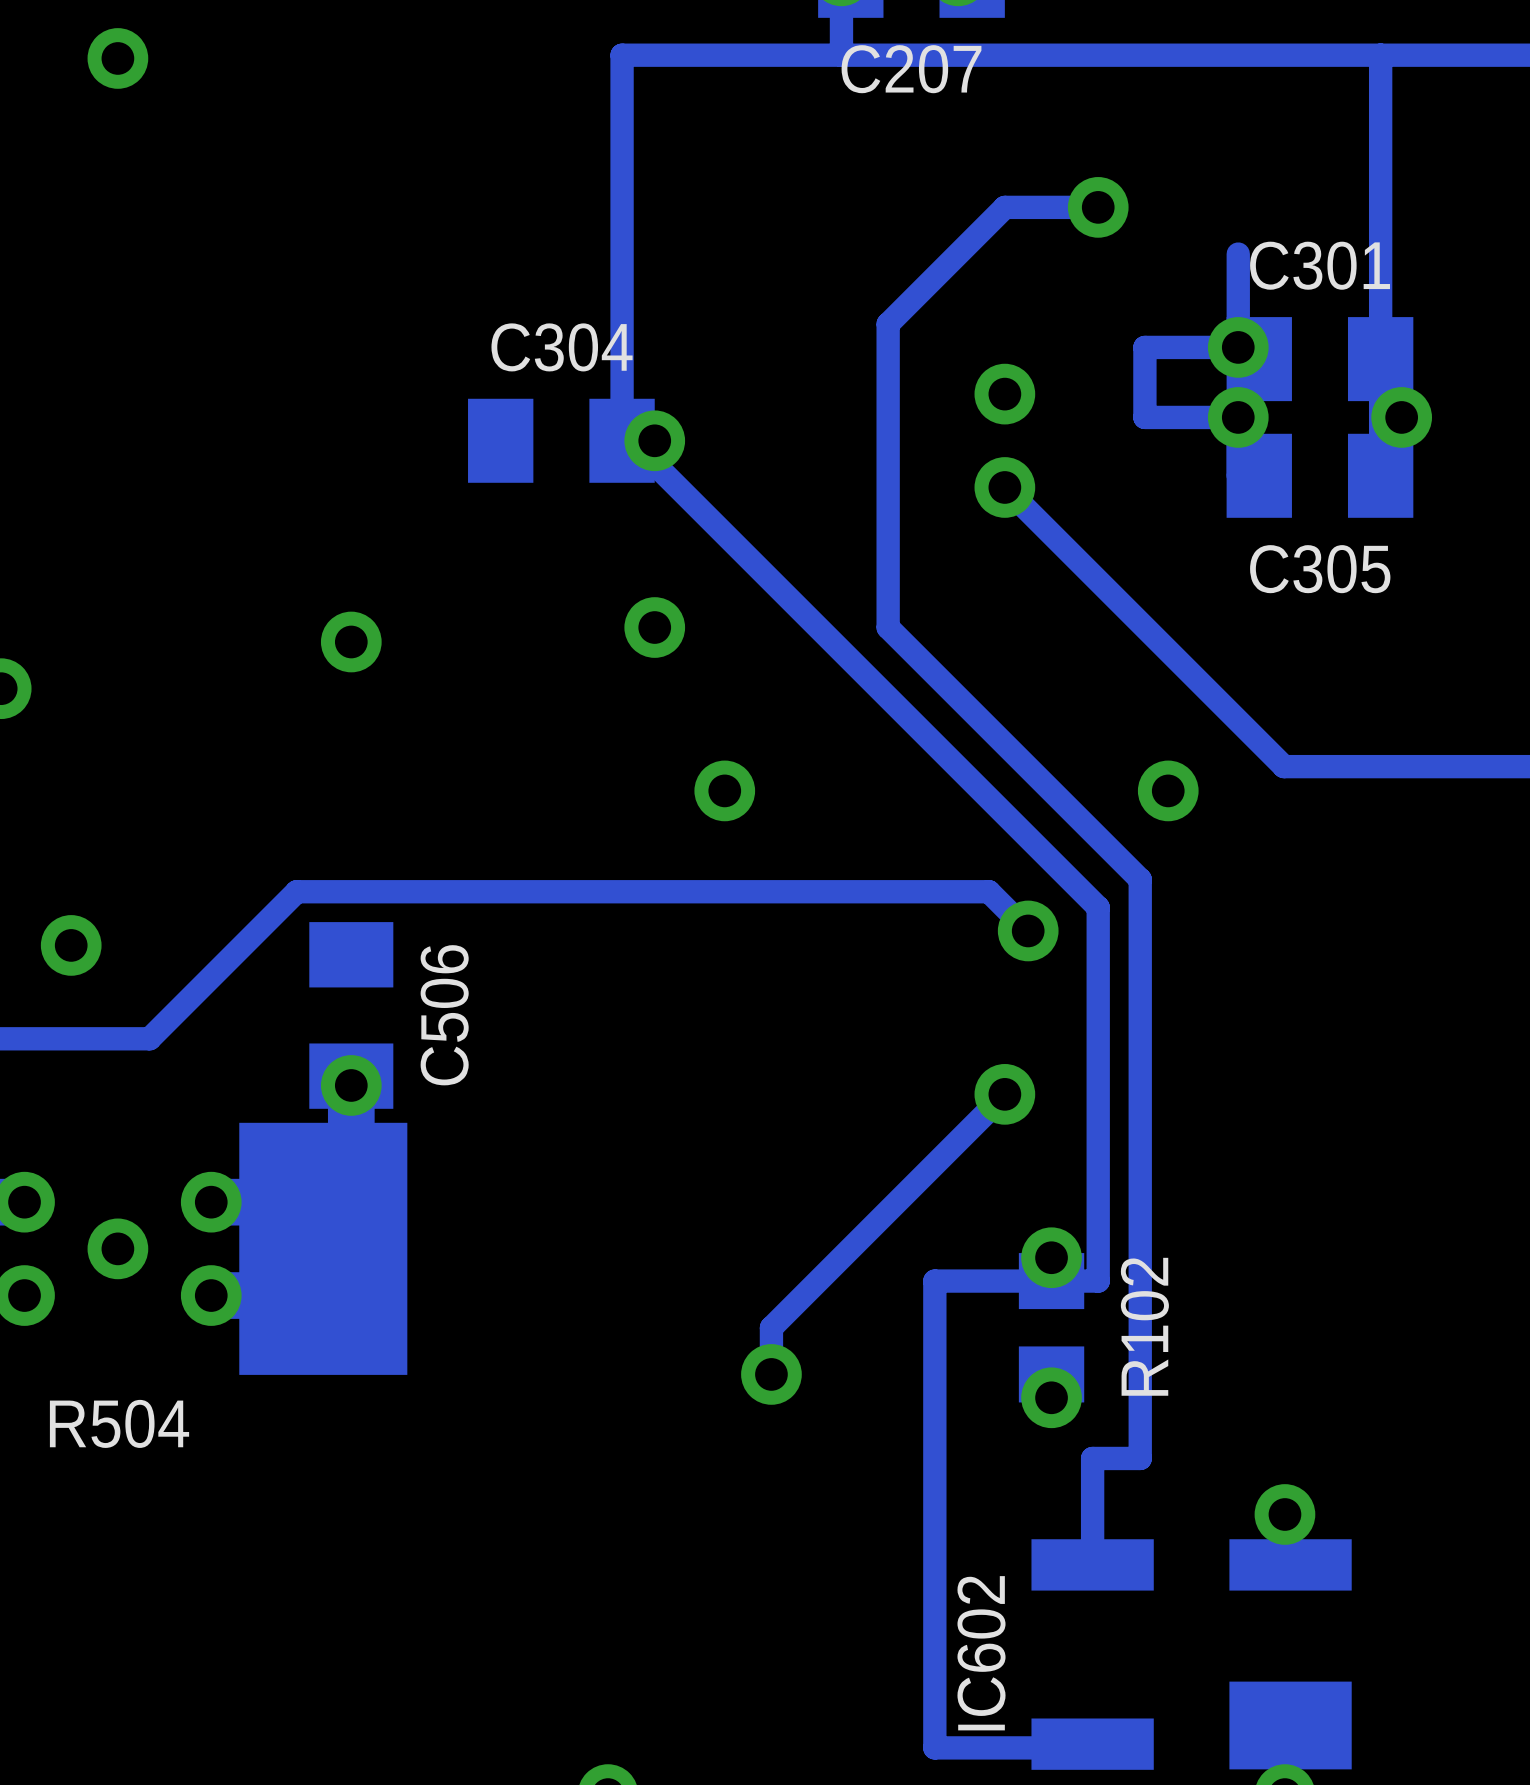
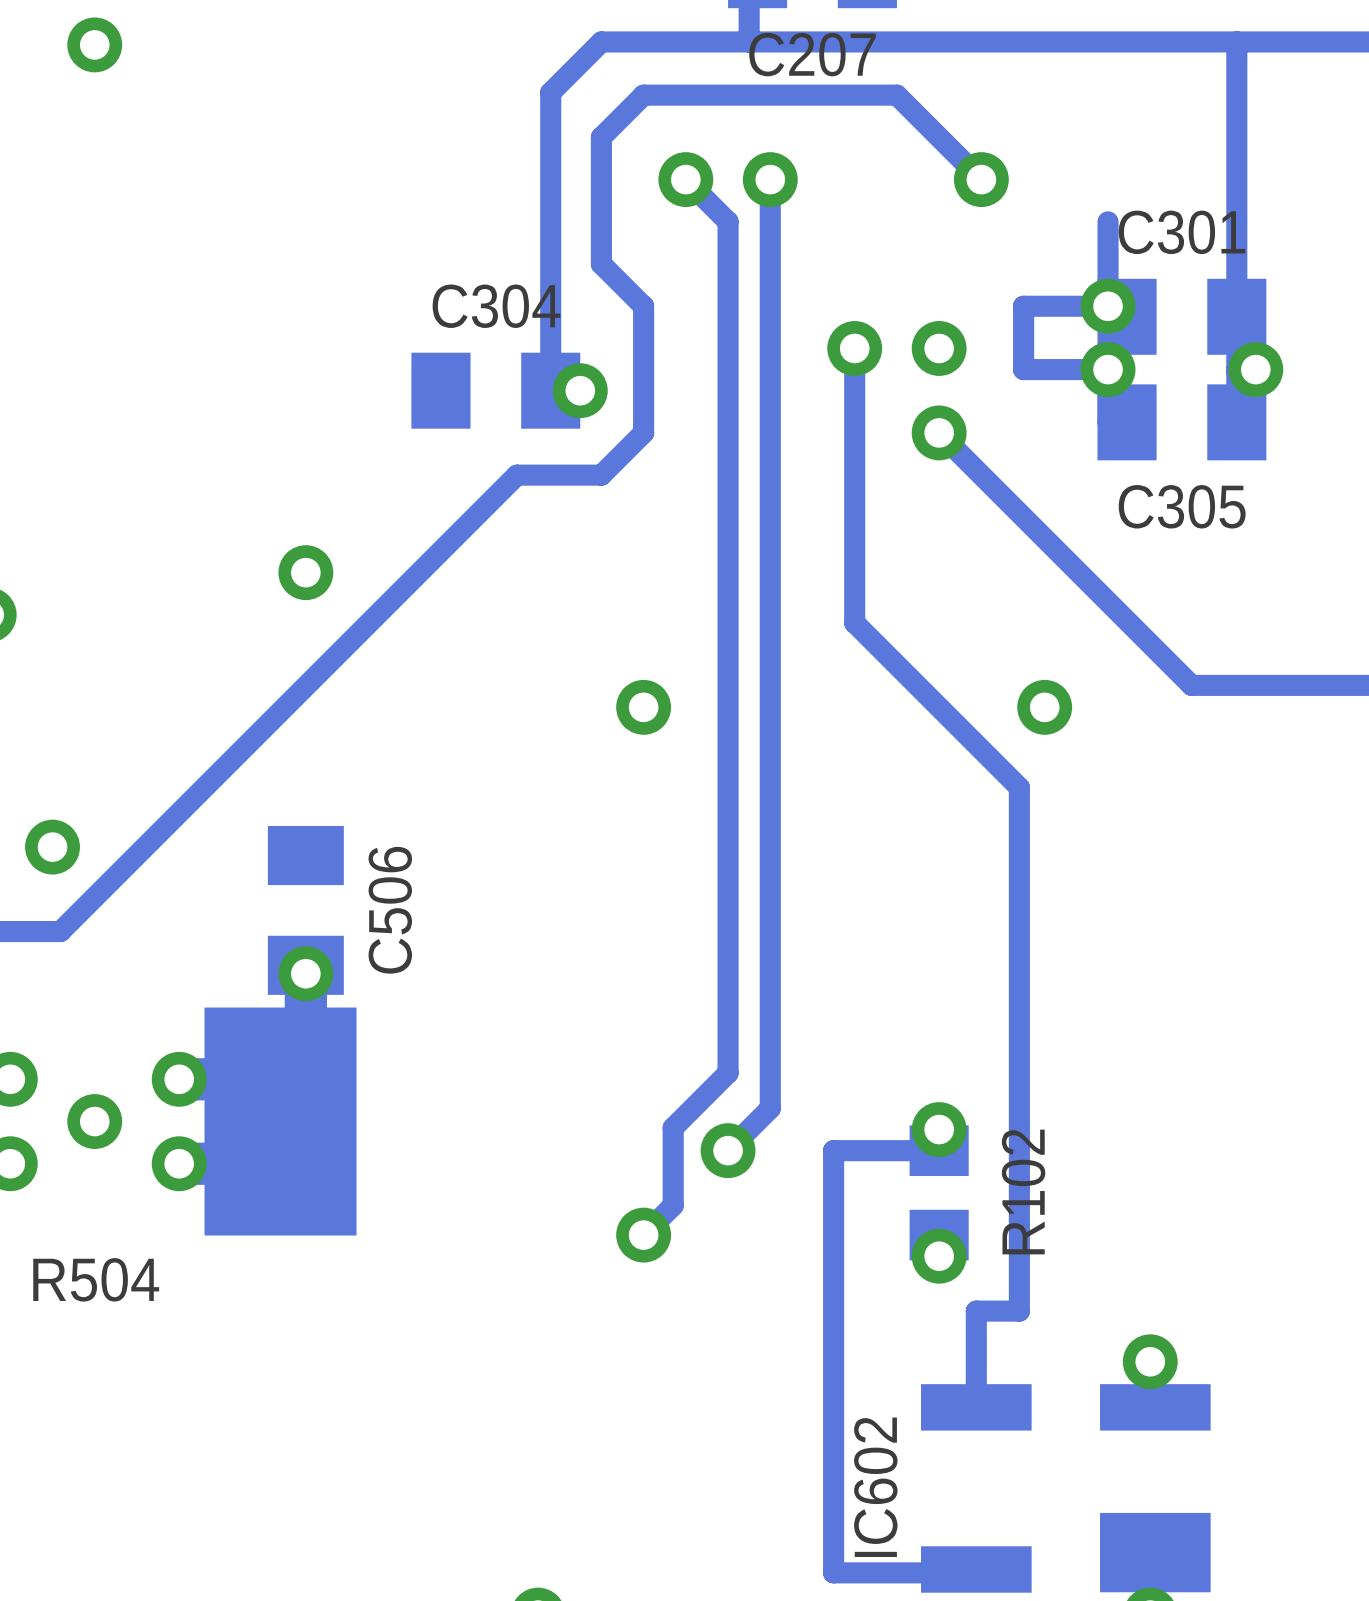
track: (678, 55) (622, 55) (622, 111) -> (601, 41) (550, 92)
track: none -> (685, 179) (728, 221) (728, 1073) (673, 1127) (673, 1205) (643, 1235)
via: none -> (685, 179)
via: none -> (770, 179)
track: (1098, 207) (1004, 207) (888, 324) (888, 627) (958, 697) -> (854, 348) (854, 622)
via: none -> (854, 348)
via: (1004, 394) -> none
via: none -> (939, 348)
track: (631, 440) (1098, 907) (1098, 1281) (1051, 1281) -> none
track: (1004, 487) (1284, 766) (1330, 766) -> (939, 432) (1191, 685)
via position: (1004, 487) -> (939, 432)
via: (654, 627) -> none
track: (1028, 930) (988, 891) (296, 891) (149, 1038) (80, 1038) -> (981, 179) (896, 95) (643, 95) (601, 137) (601, 264) (643, 306) (643, 432) (601, 475) (516, 475) (60, 931)
via: (1028, 930) -> none
track: (1004, 1094) (864, 1234) -> (770, 179) (770, 1108)
via: (1004, 1094) -> none
track: (818, 1281) (771, 1327) (771, 1374) -> none
via: none -> (728, 1150)
via position: (771, 1374) -> (643, 1235)

